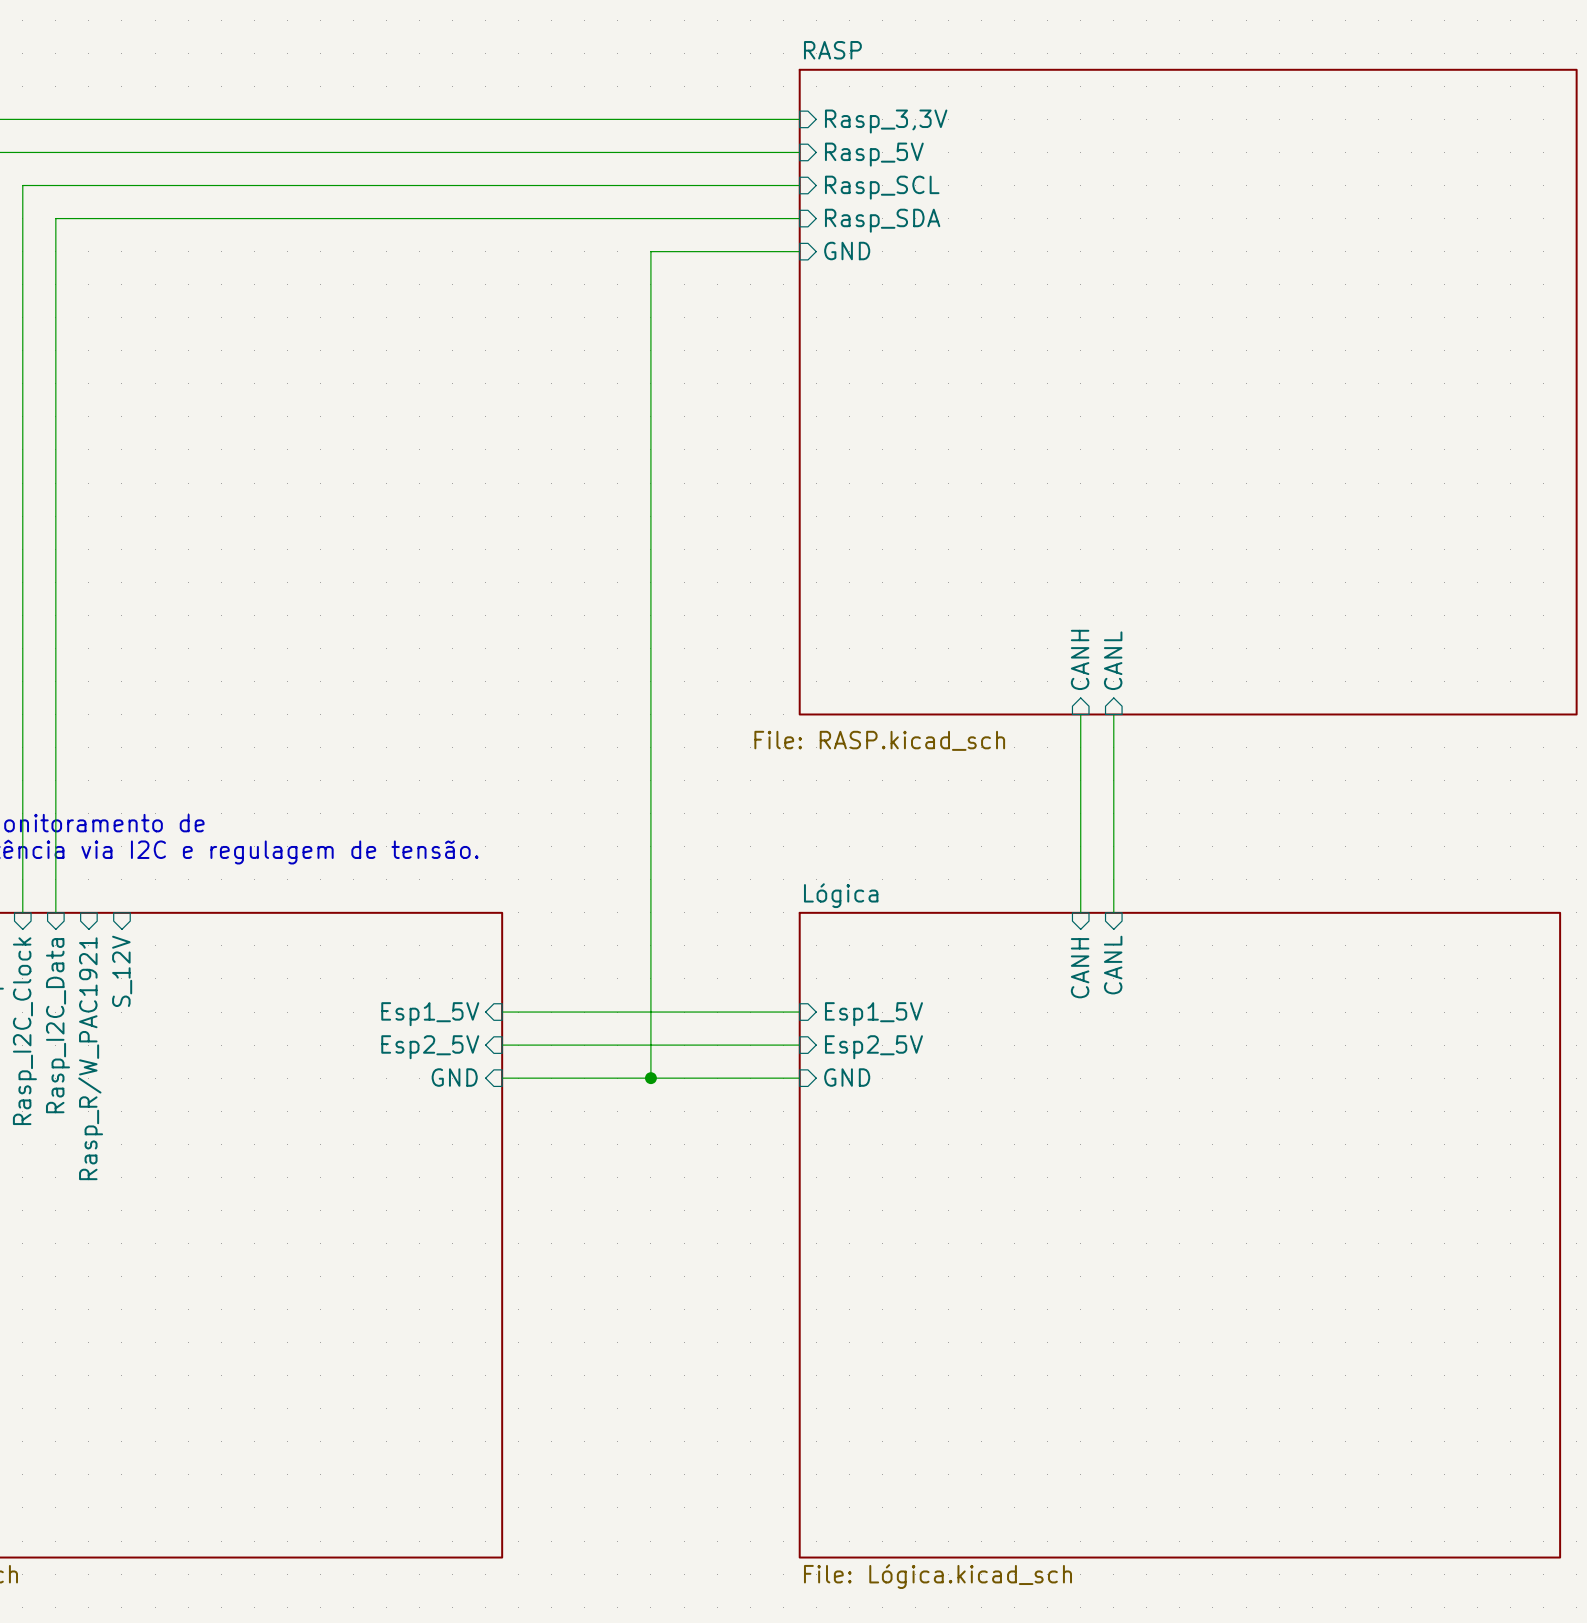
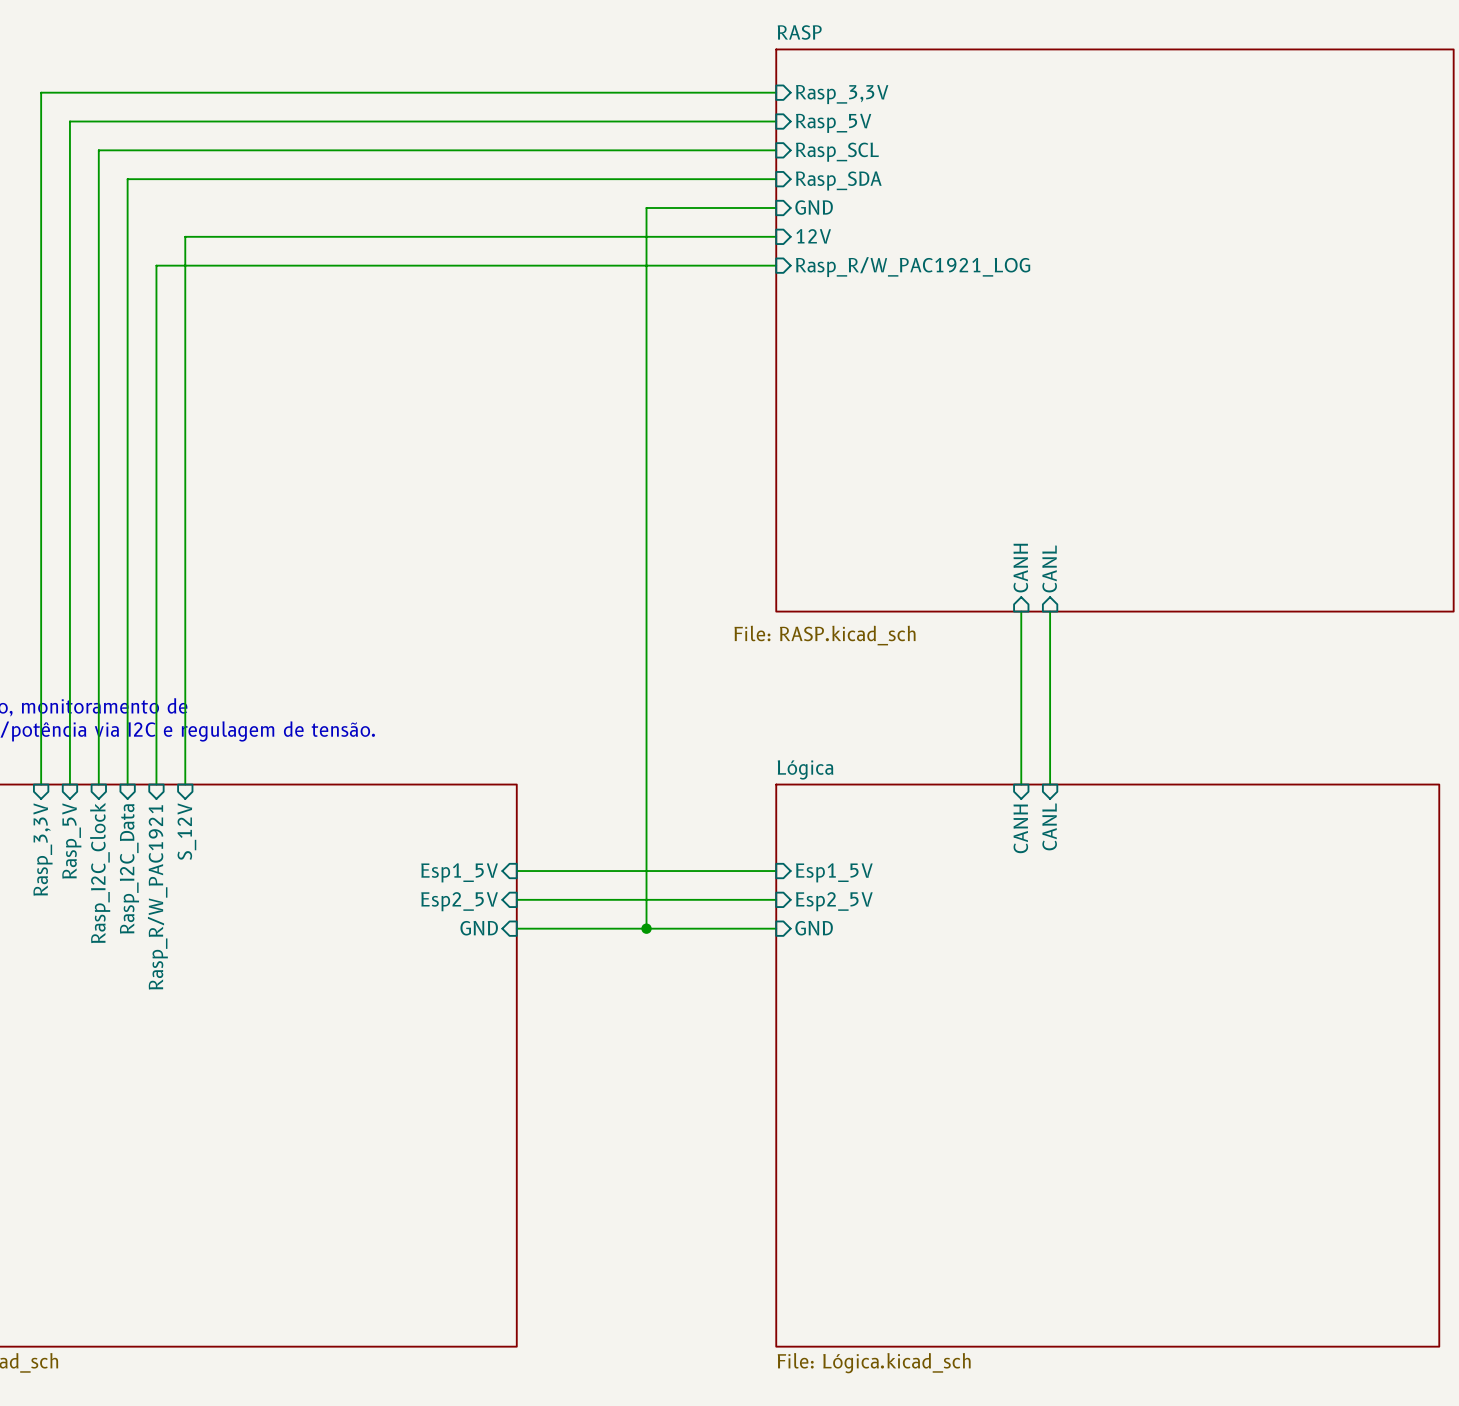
wire: none -> (776, 236) (185, 236) (185, 784)
sheet pin: none -> 12V (813, 236)
wire: none -> (776, 265) (156, 265) (156, 784)
sheet pin: none -> Rasp_R/W_PAC1921_LOG (913, 267)

